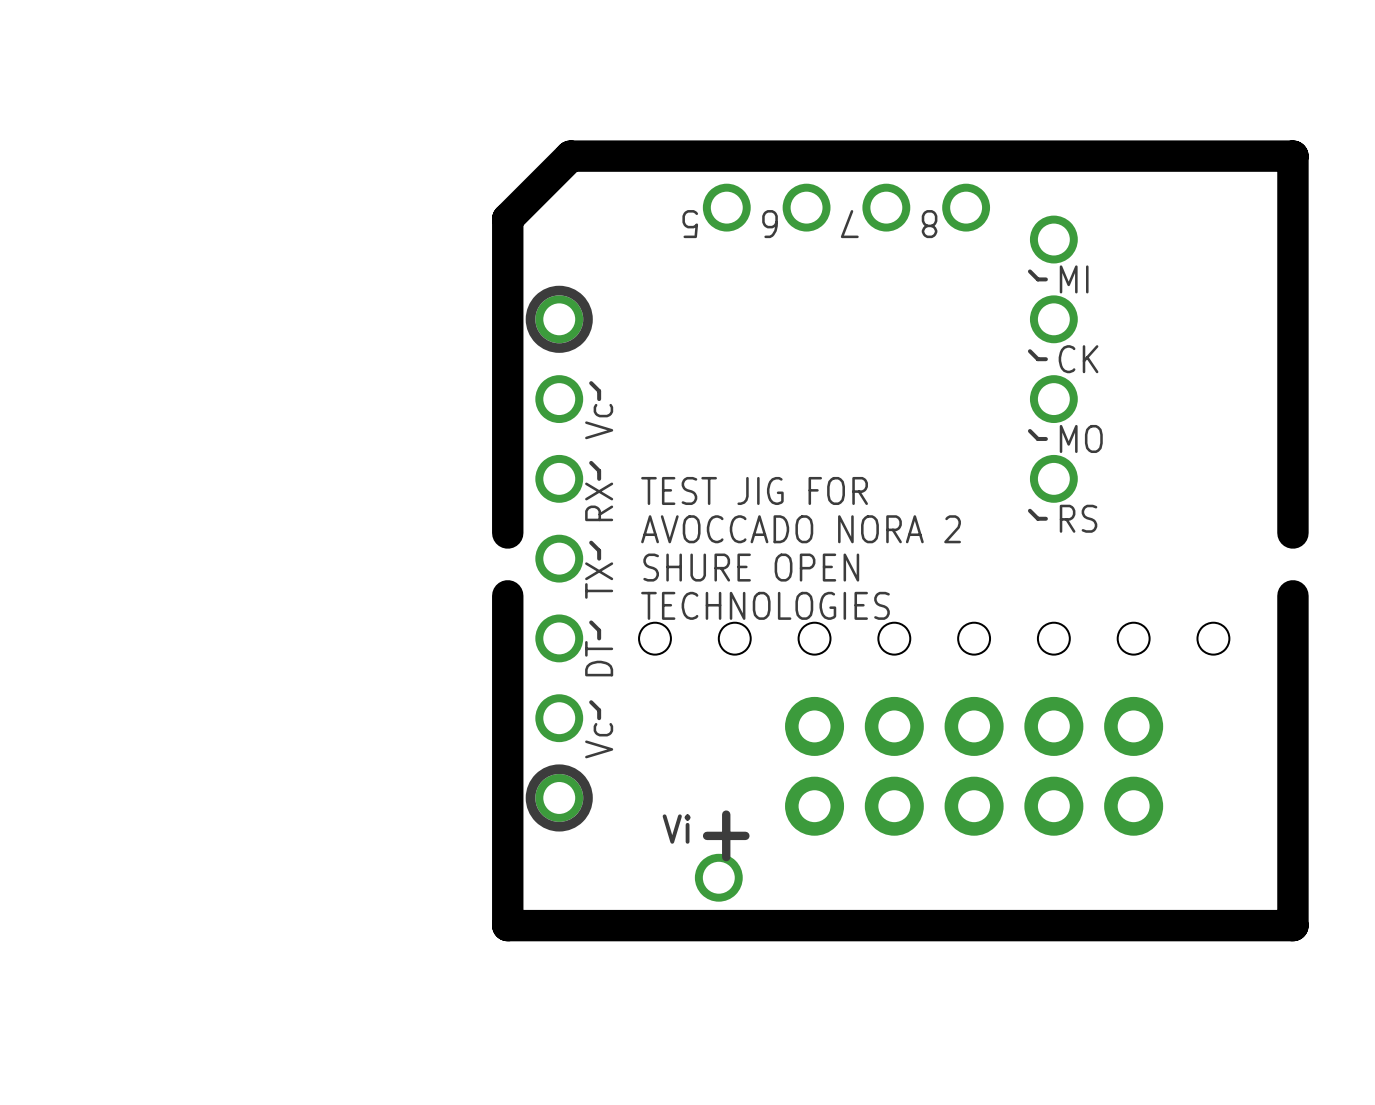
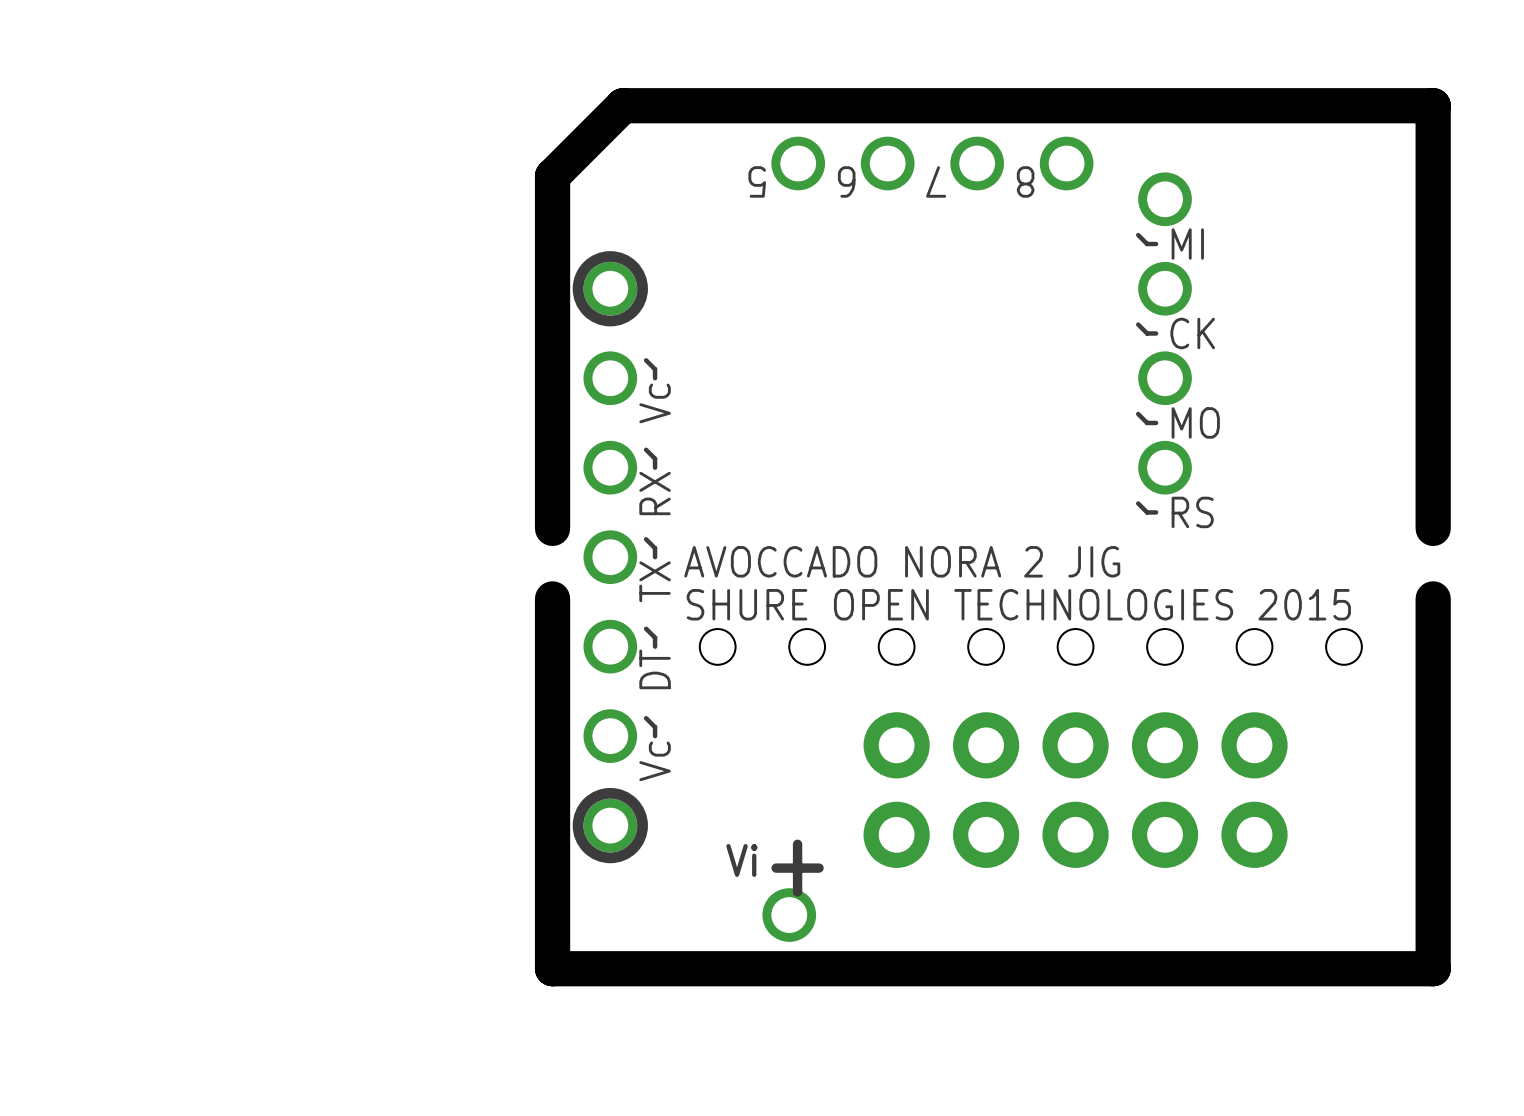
text: TEST JIG FOR (754, 490) -> none
text: AVOCCADO NORA 2 (801, 529) -> none
text: SHURE OPEN (751, 567) -> AVOCCADO NORA 2 JIG (902, 561)
text: TECHNOLOGIES (765, 605) -> SHURE OPEN TECHNOLOGIES 2015 (1018, 604)

